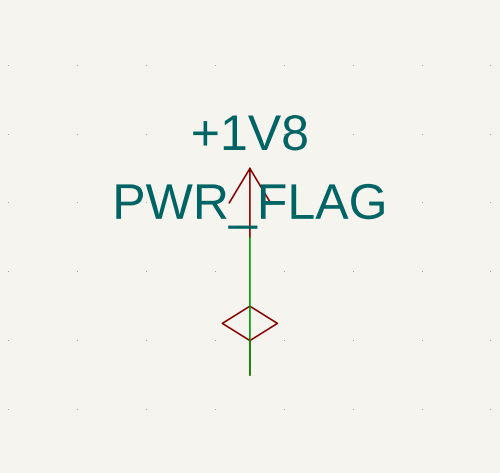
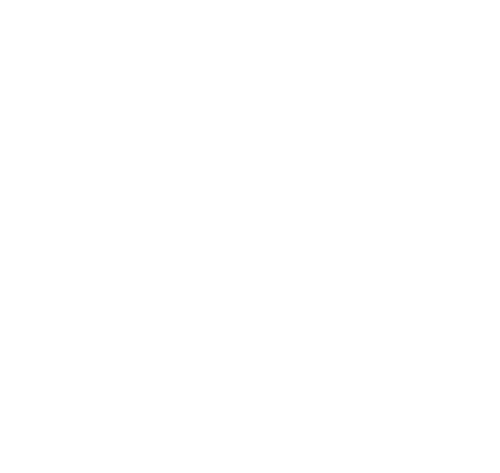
power symbol: +1V8 (249, 202) -> none
wire: (249, 237) (249, 375) -> none
power symbol: PWR_FLAG (249, 340) -> none

